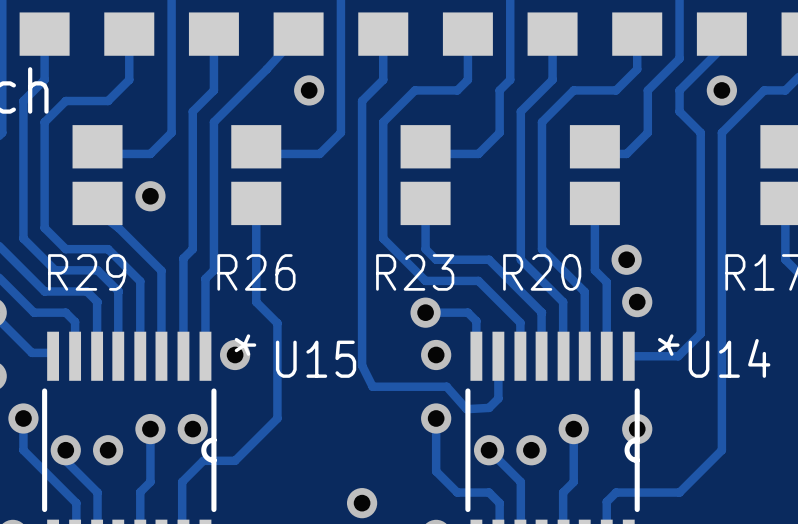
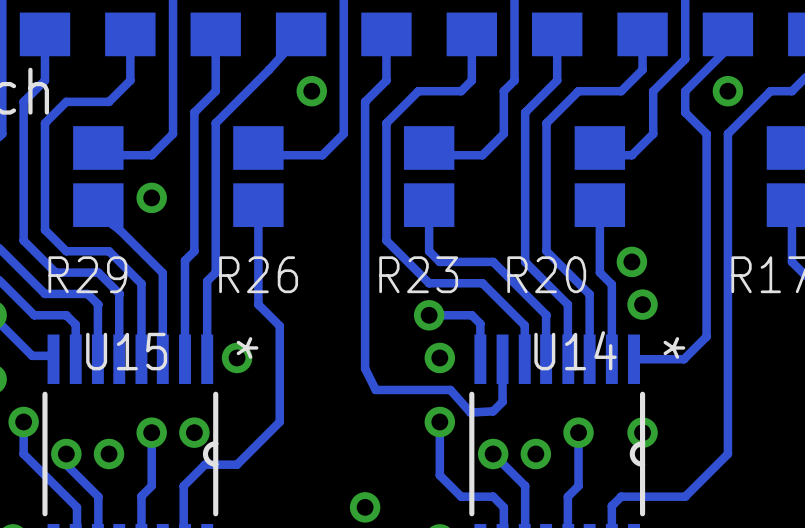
U14 name position: U14 (729, 358) -> U14 (575, 350)
U15 name position: U15 (316, 359) -> U15 (126, 351)

